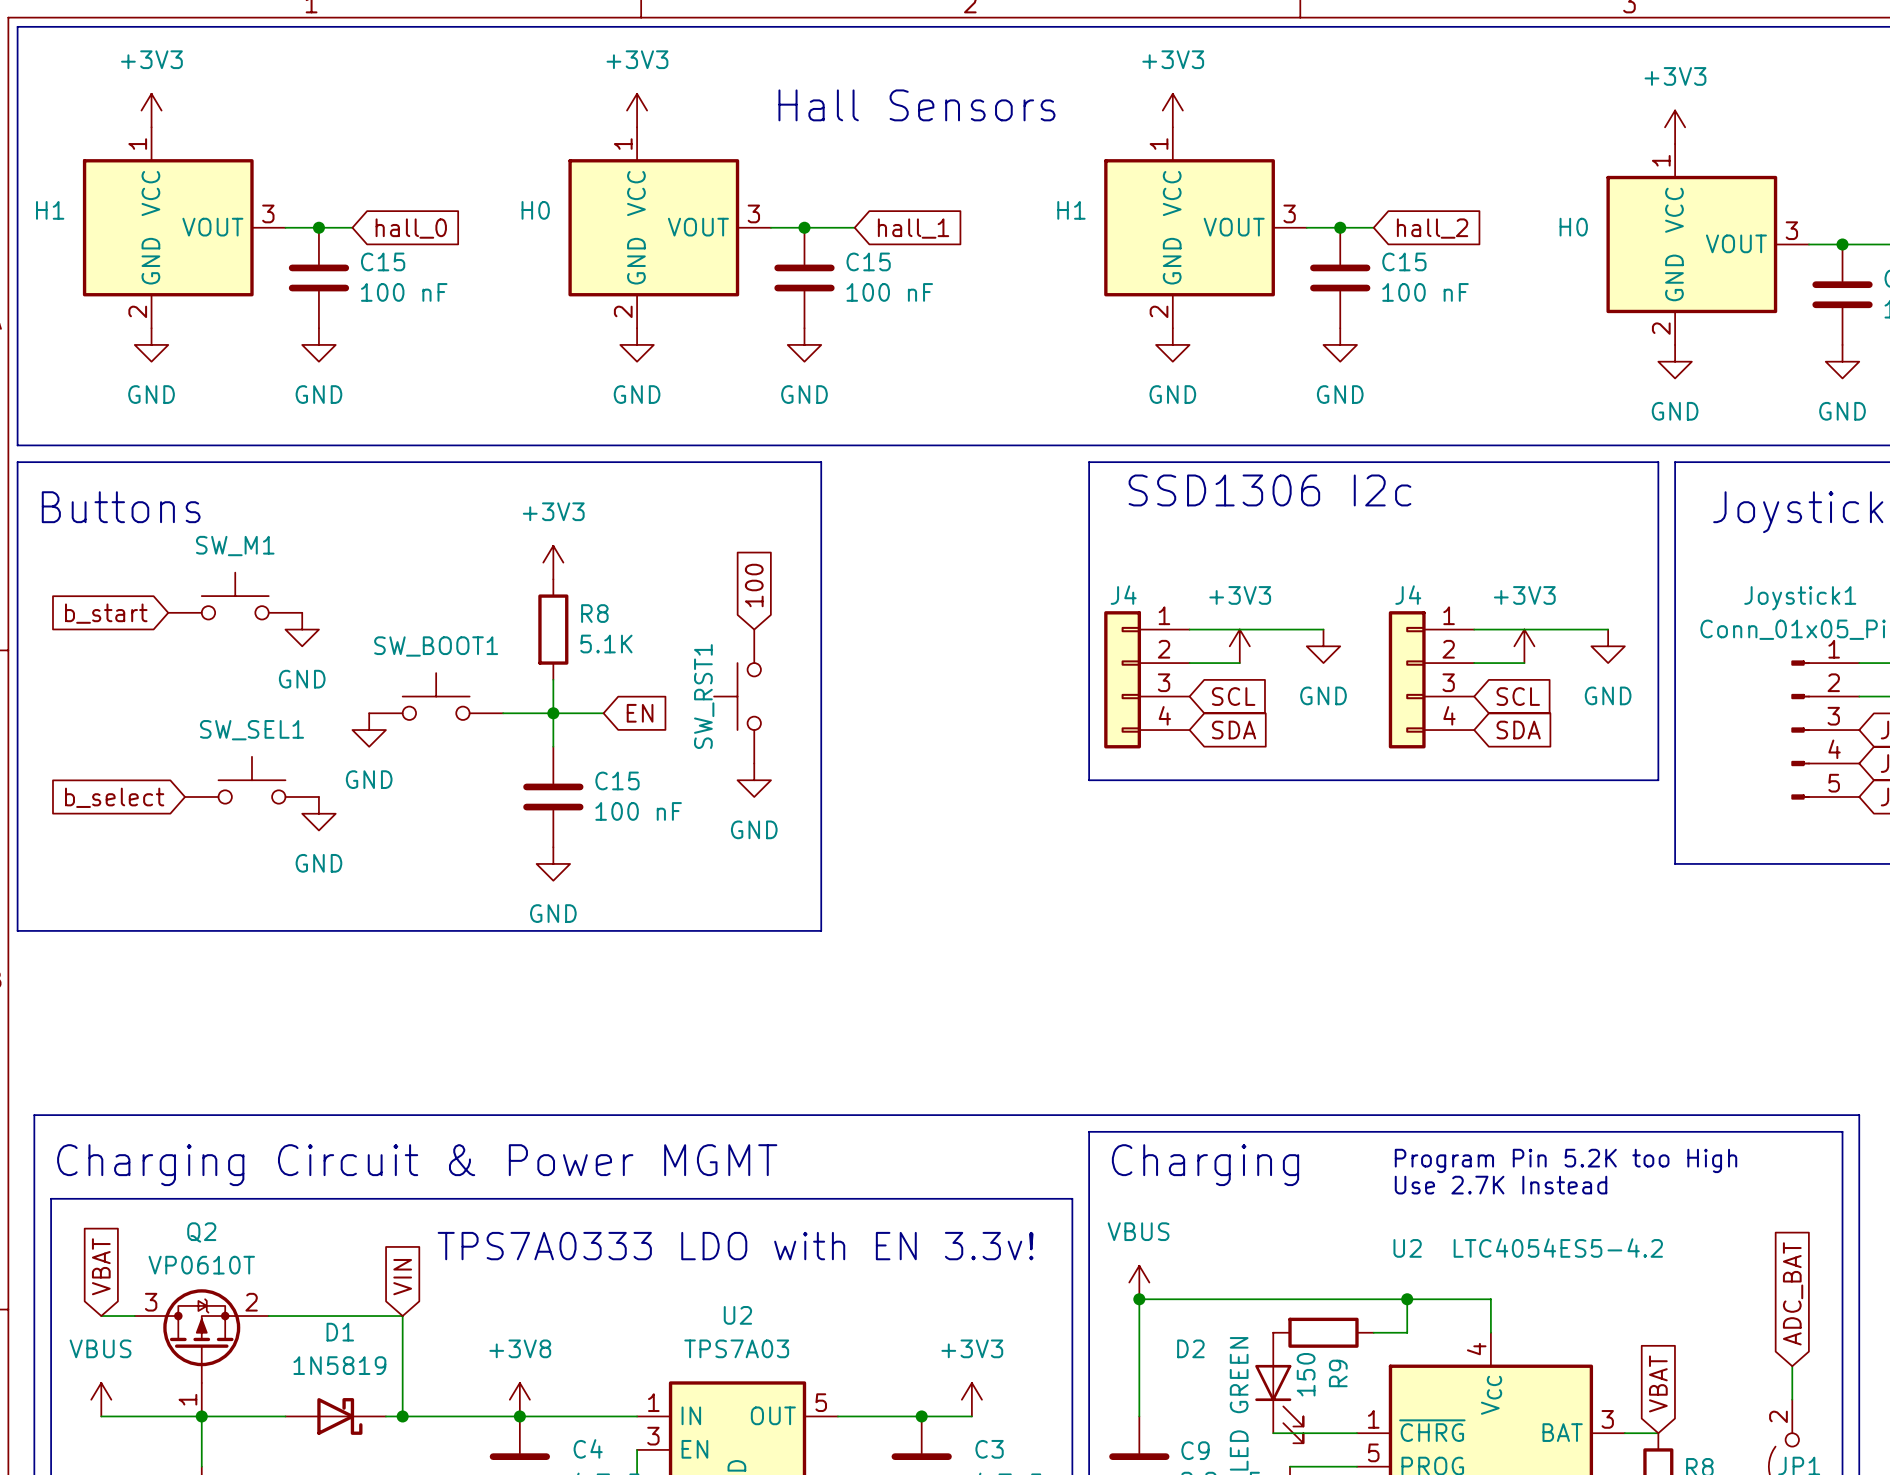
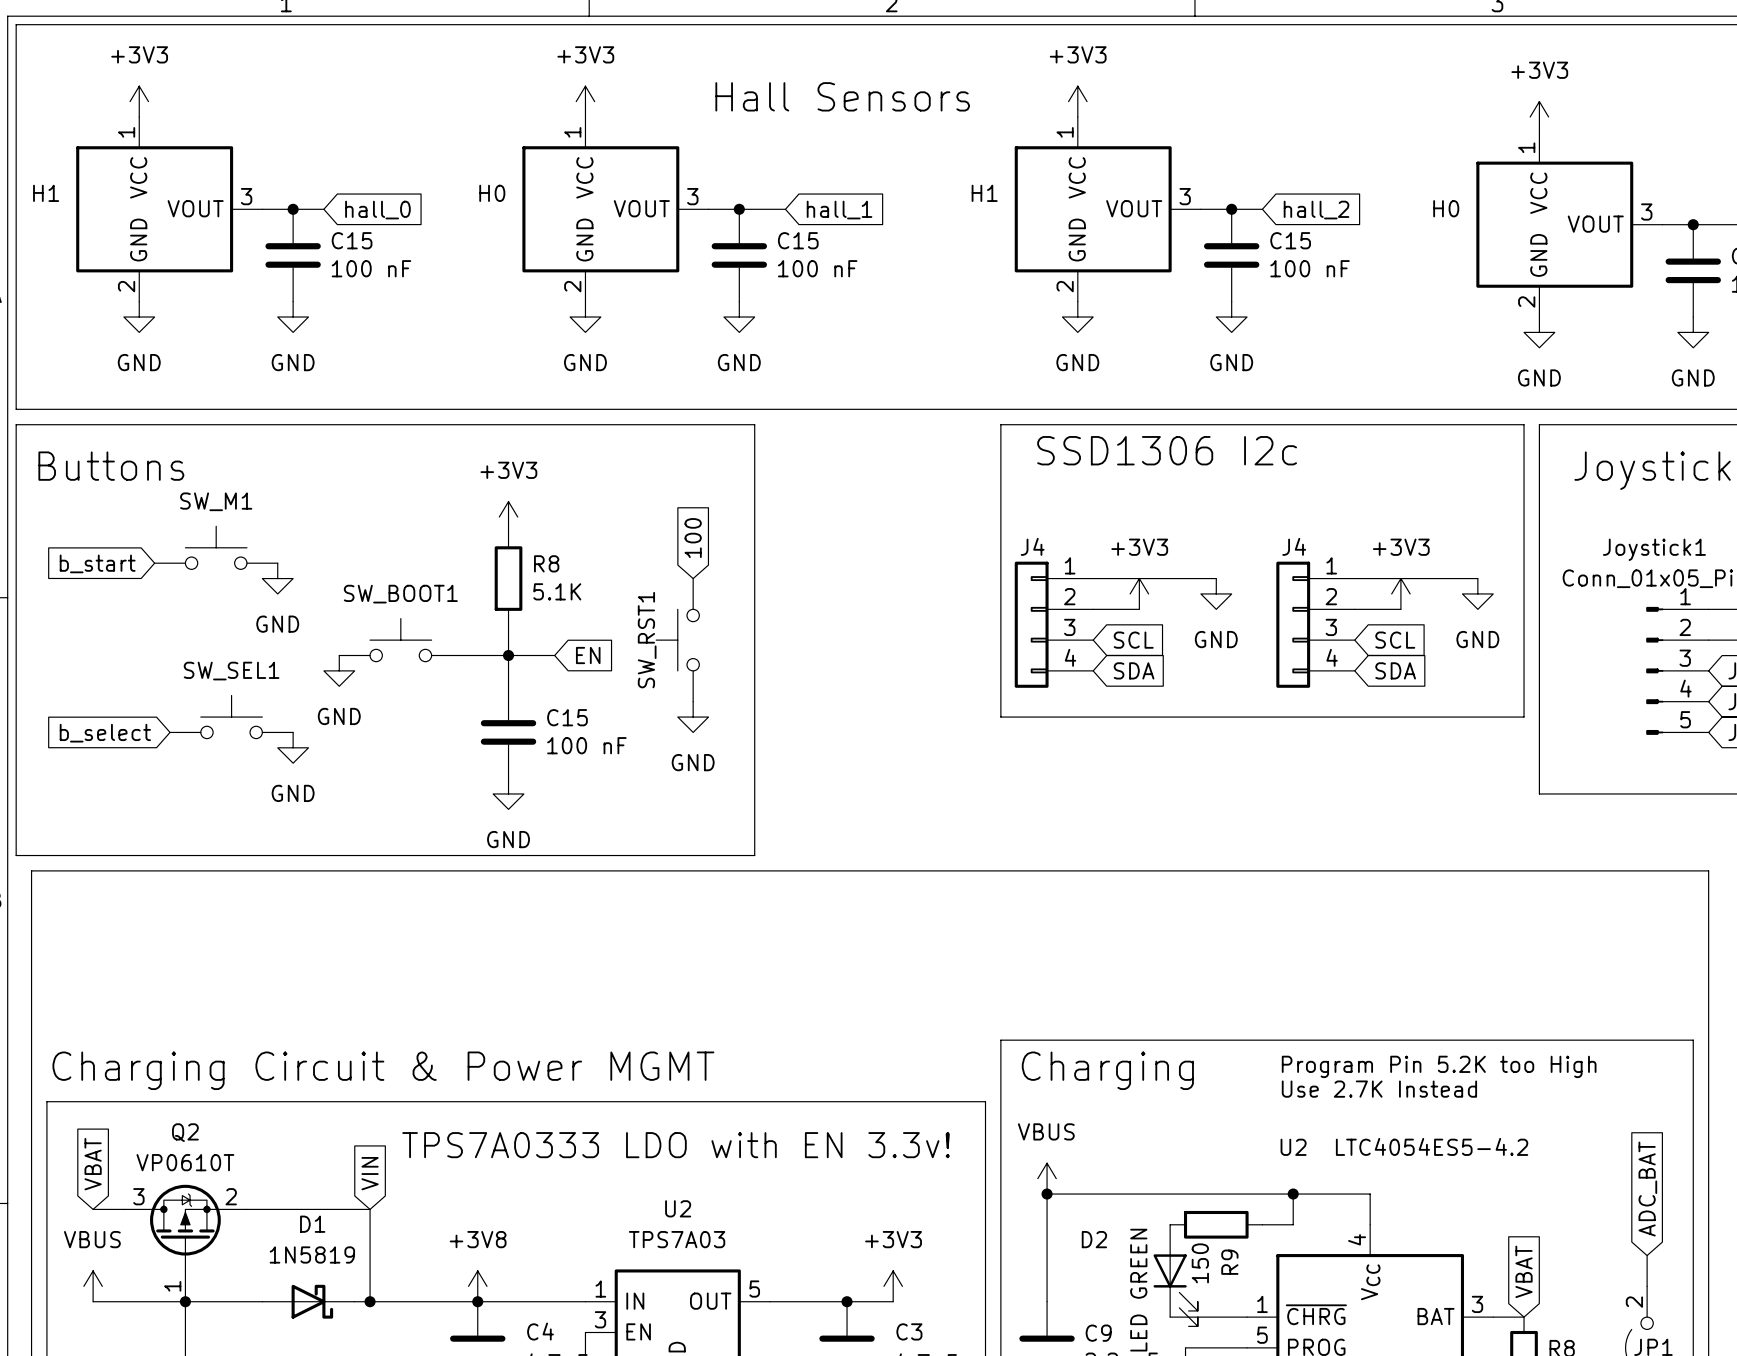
line: (34, 1115) (1859, 1115) -> (31, 1024) (31, 870) (1708, 870) (1708, 1024)

